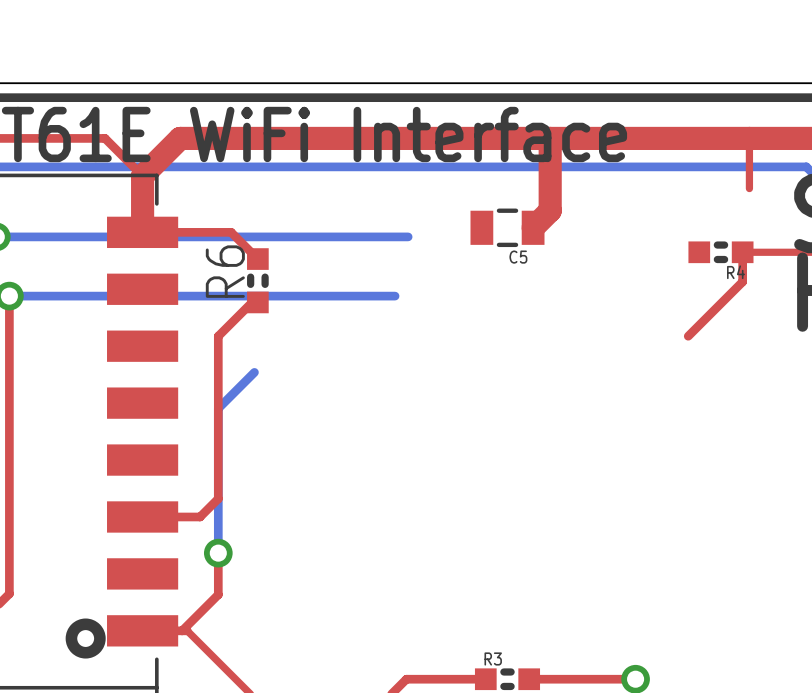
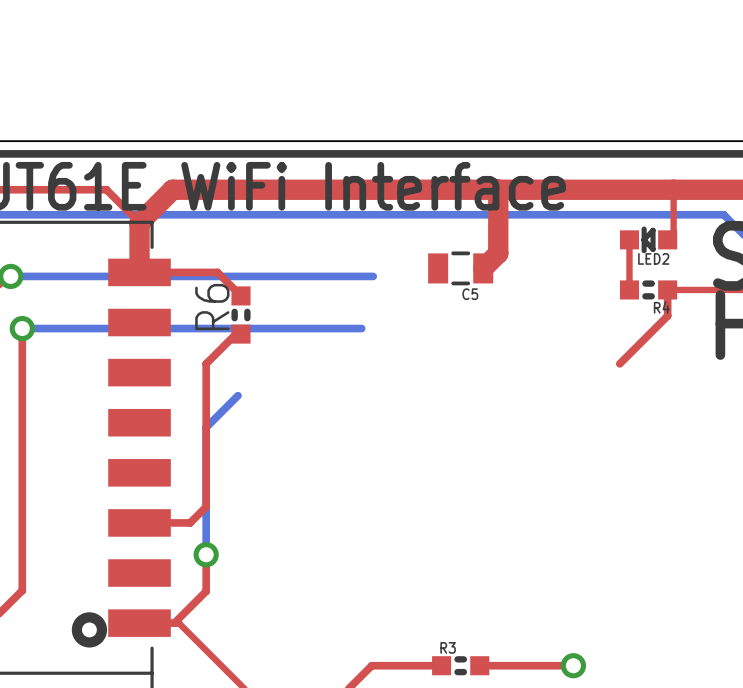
top track: none -> (629, 239) (629, 289)
LED2: none -> (648, 239)

